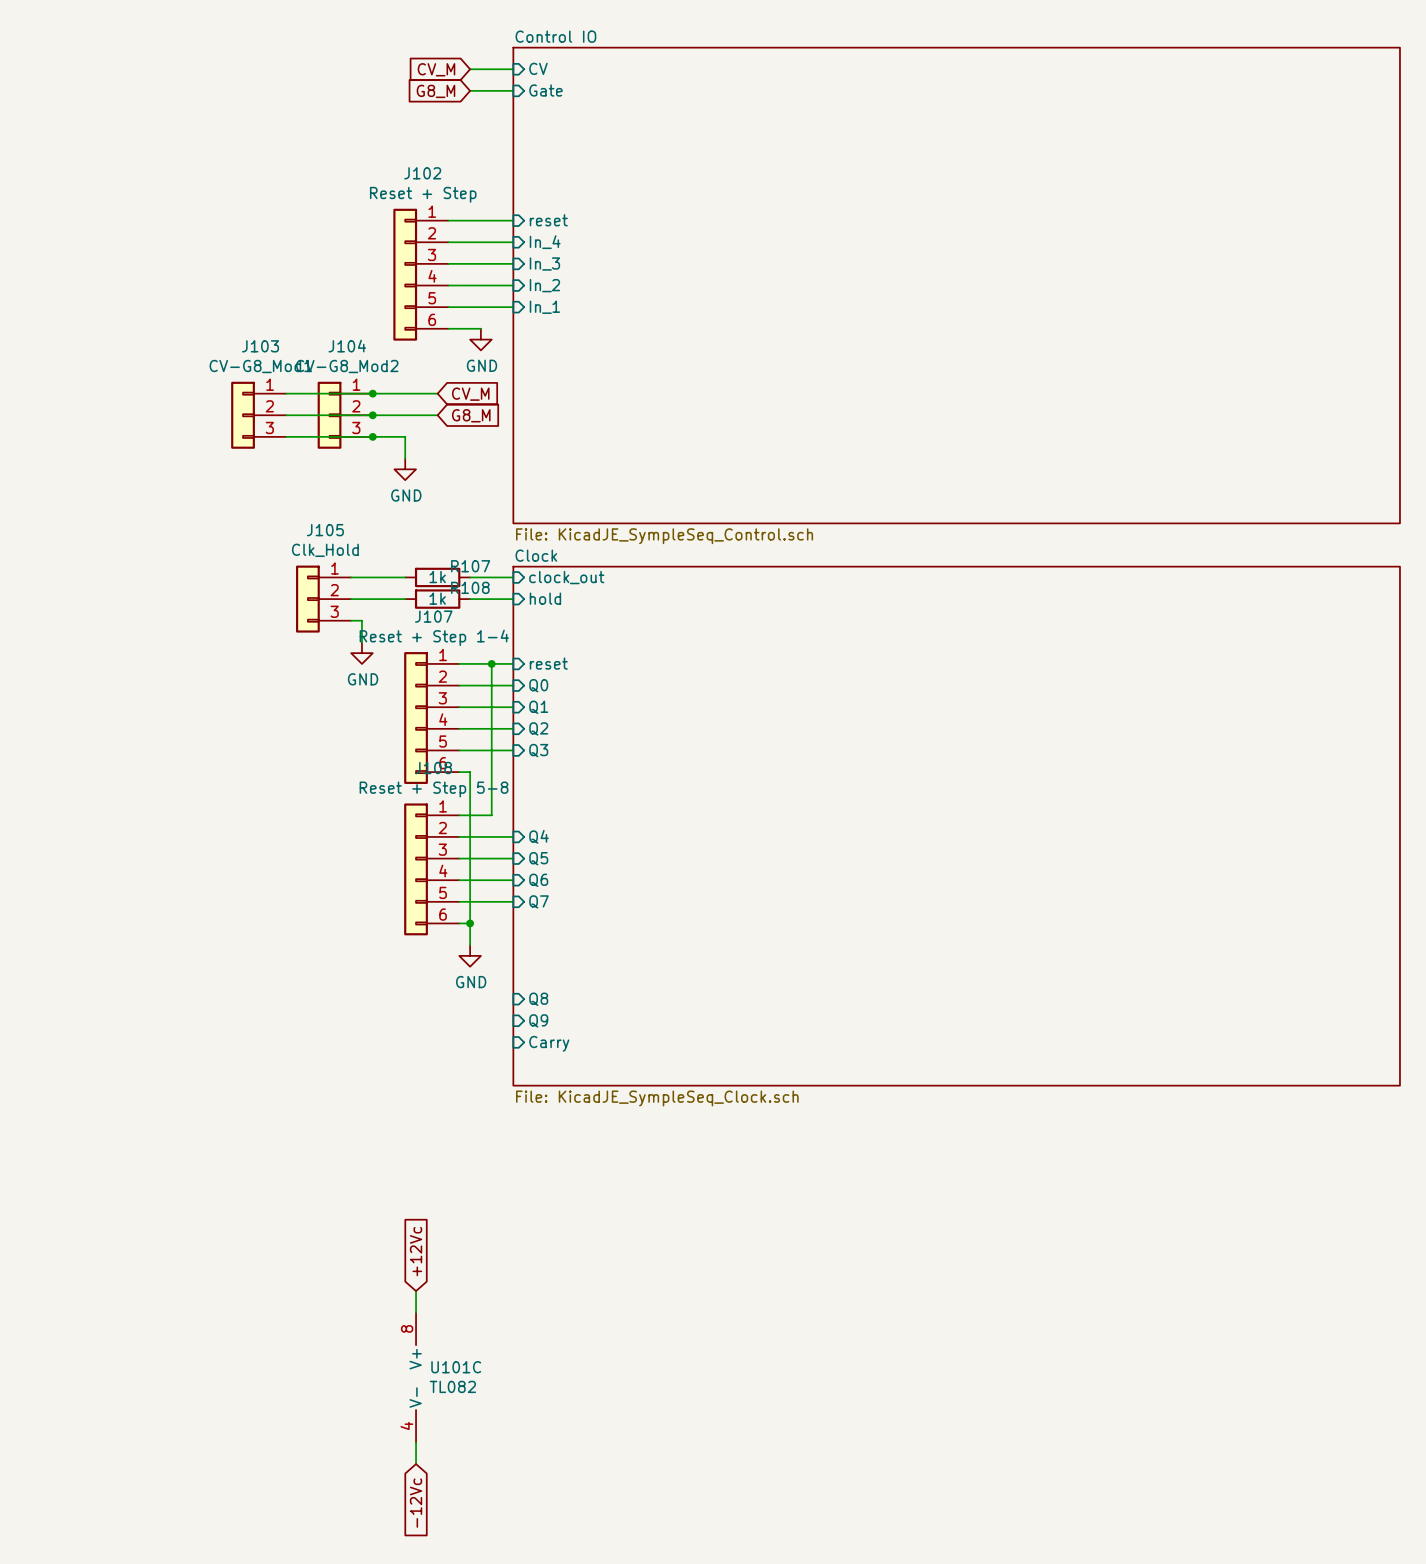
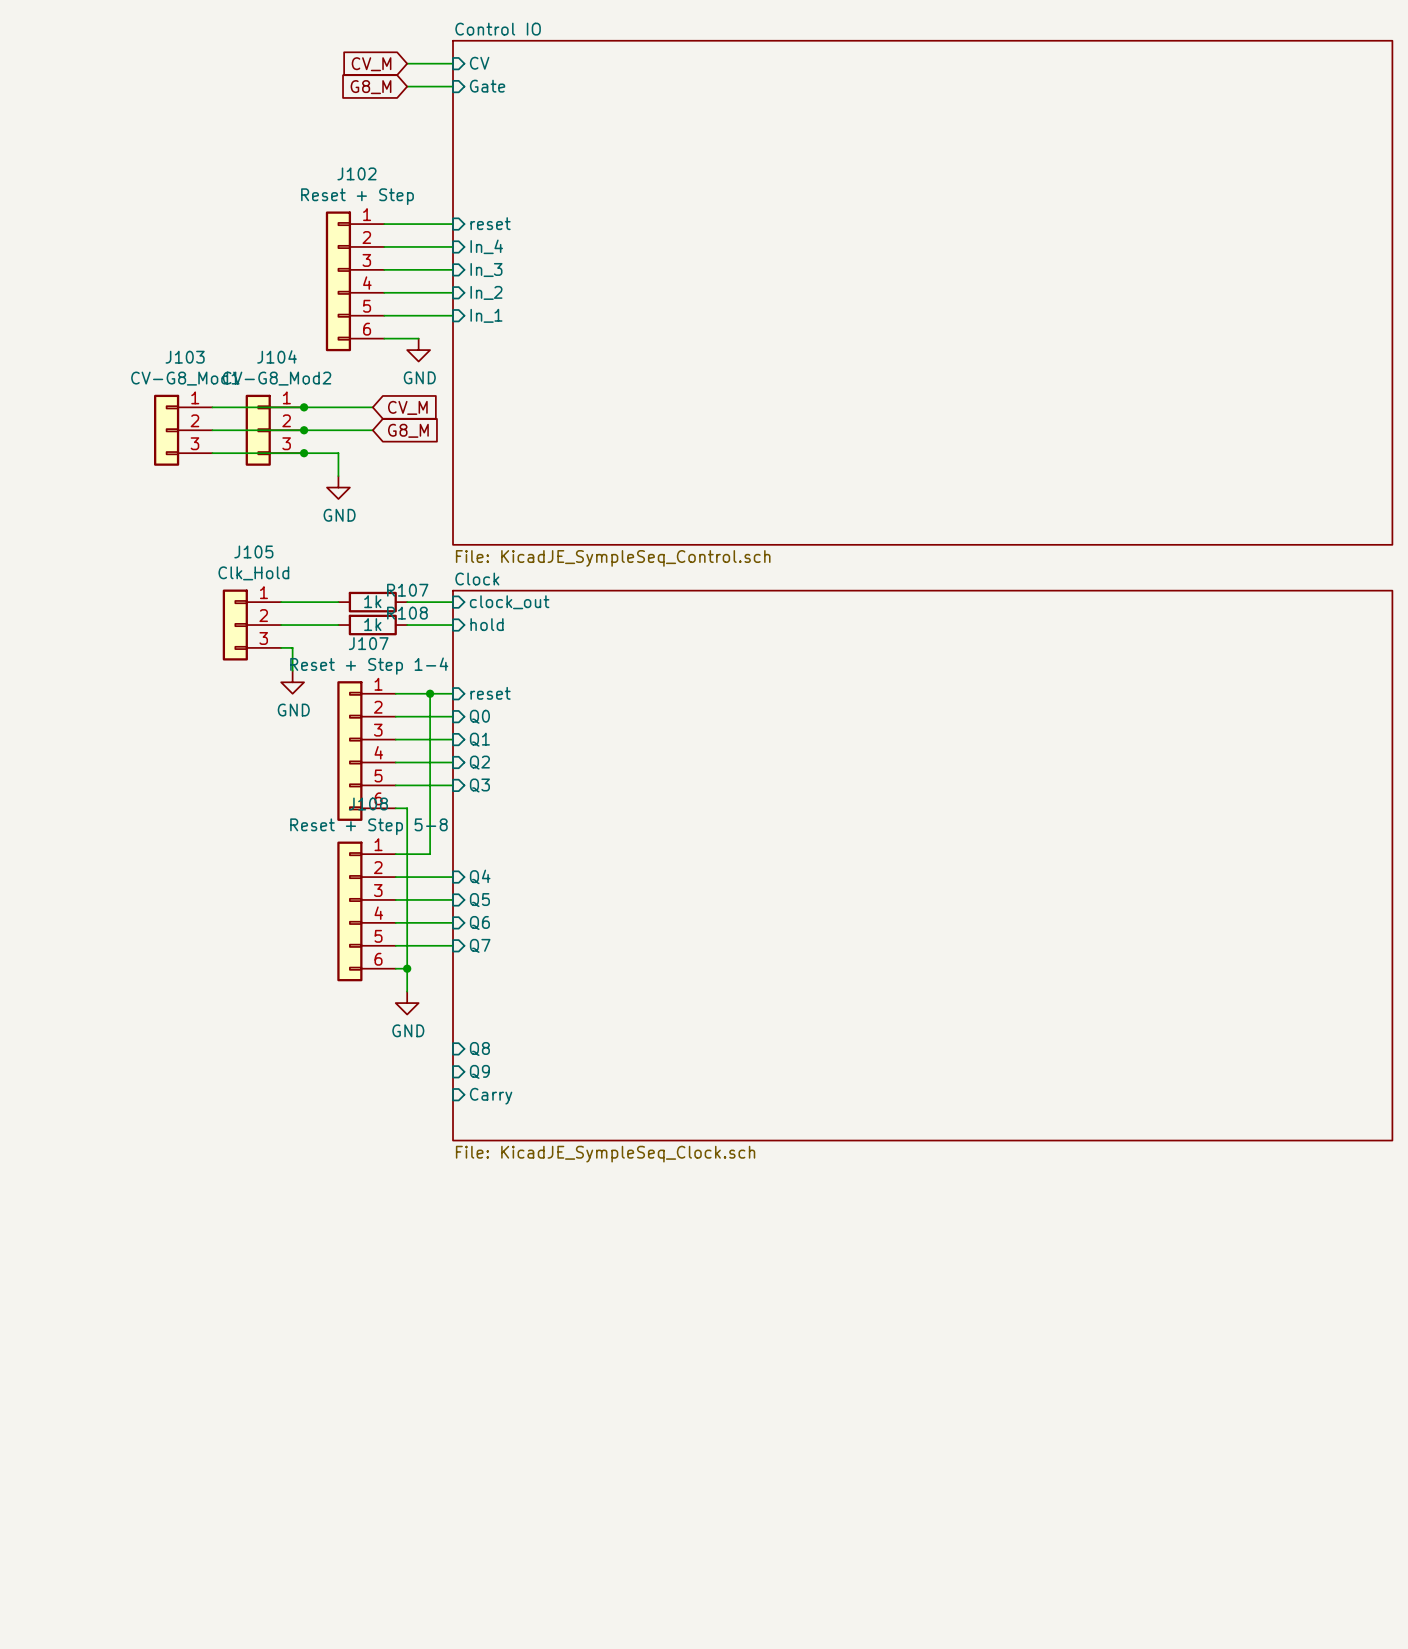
global label: +12Vc (416, 1251) -> none
wire: (416, 1291) (416, 1312) -> none
U101C: TL082 (416, 1377) -> none
wire: (416, 1442) (416, 1464) -> none
global label: -12Vc (416, 1503) -> none

